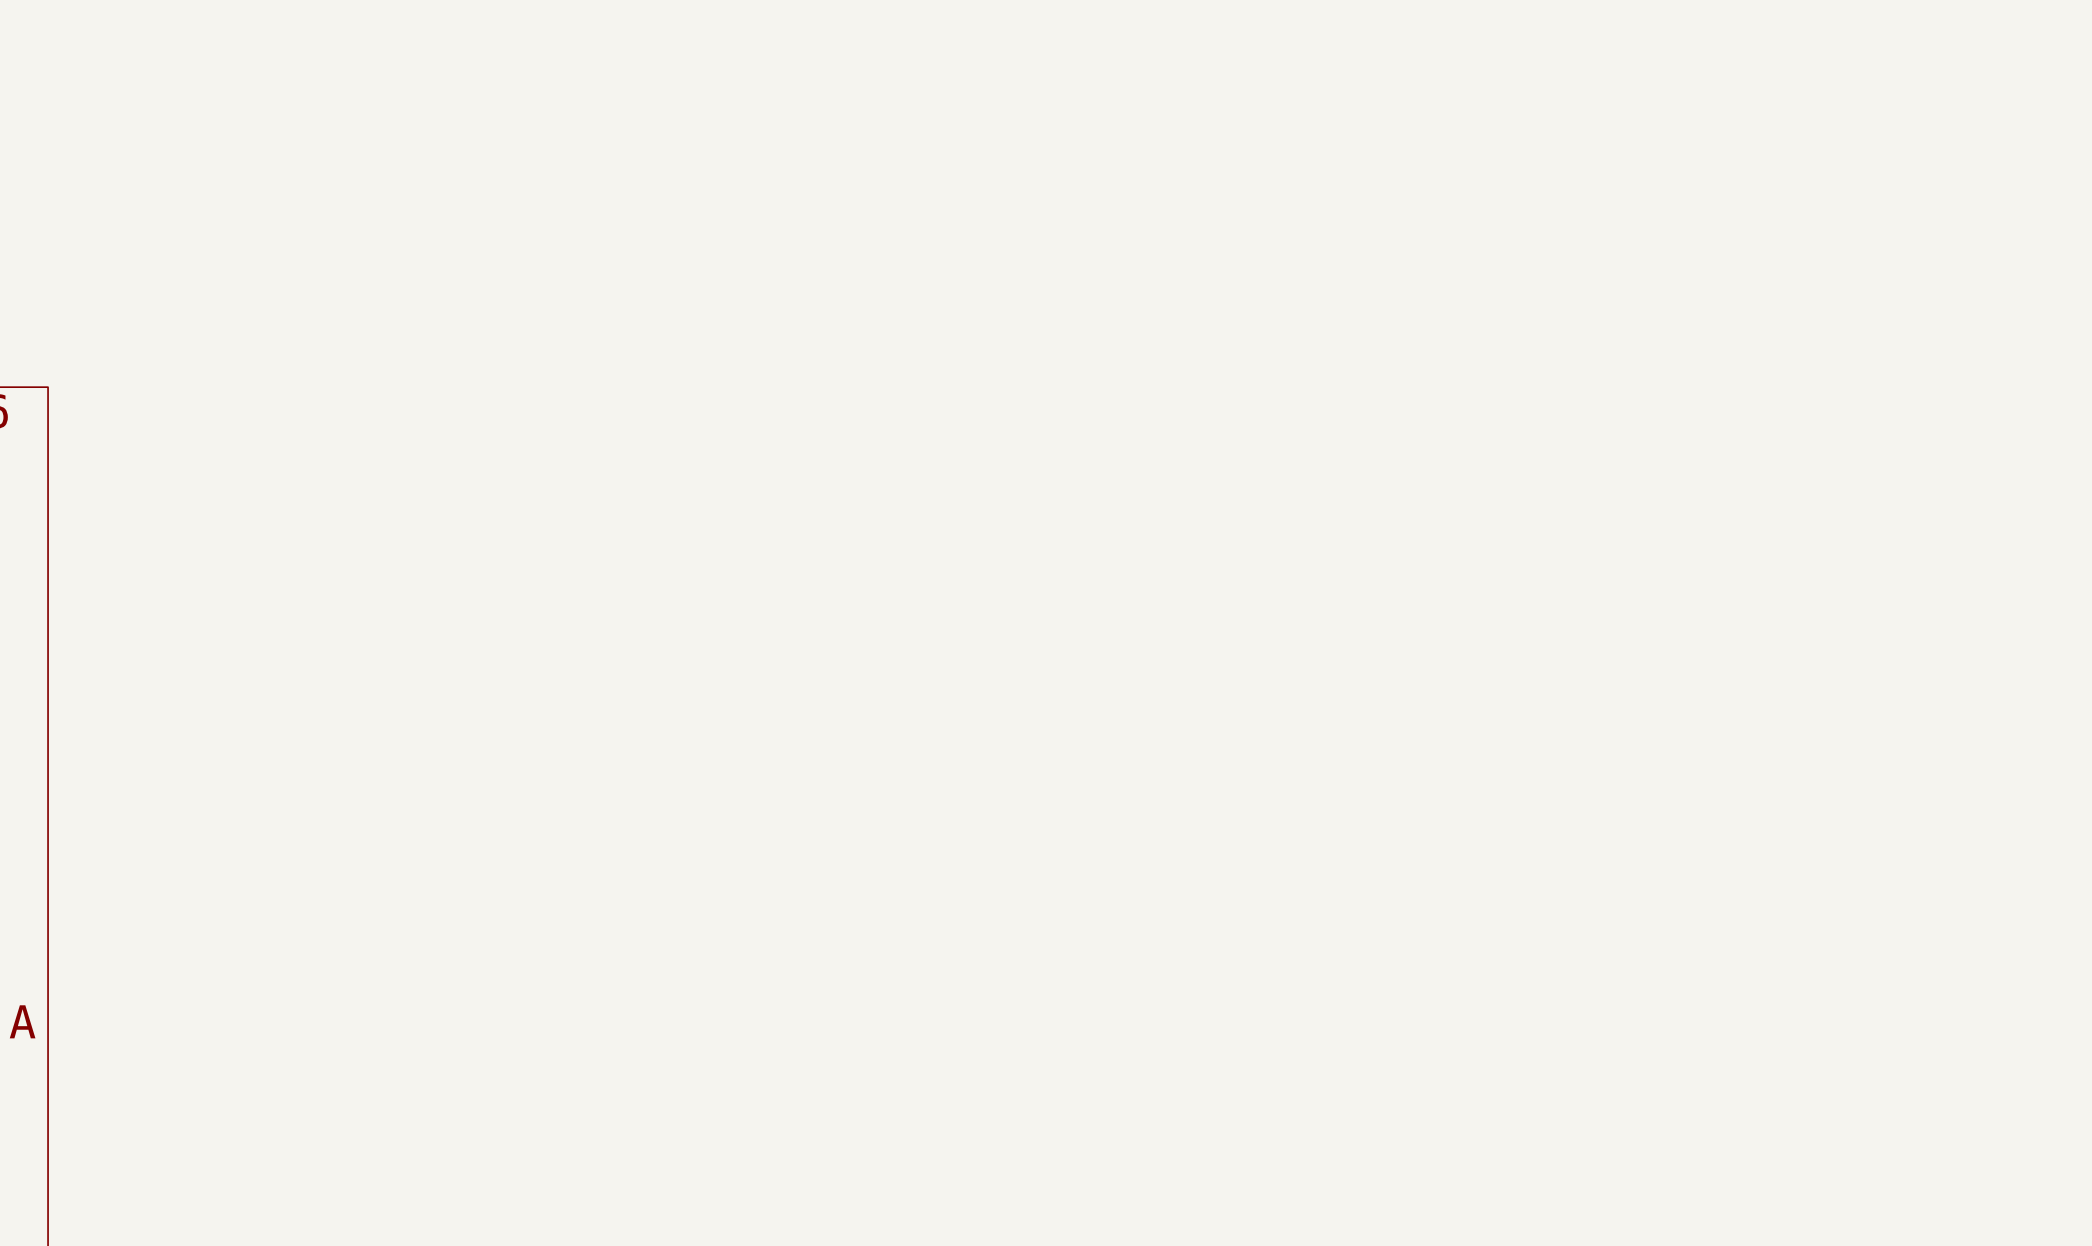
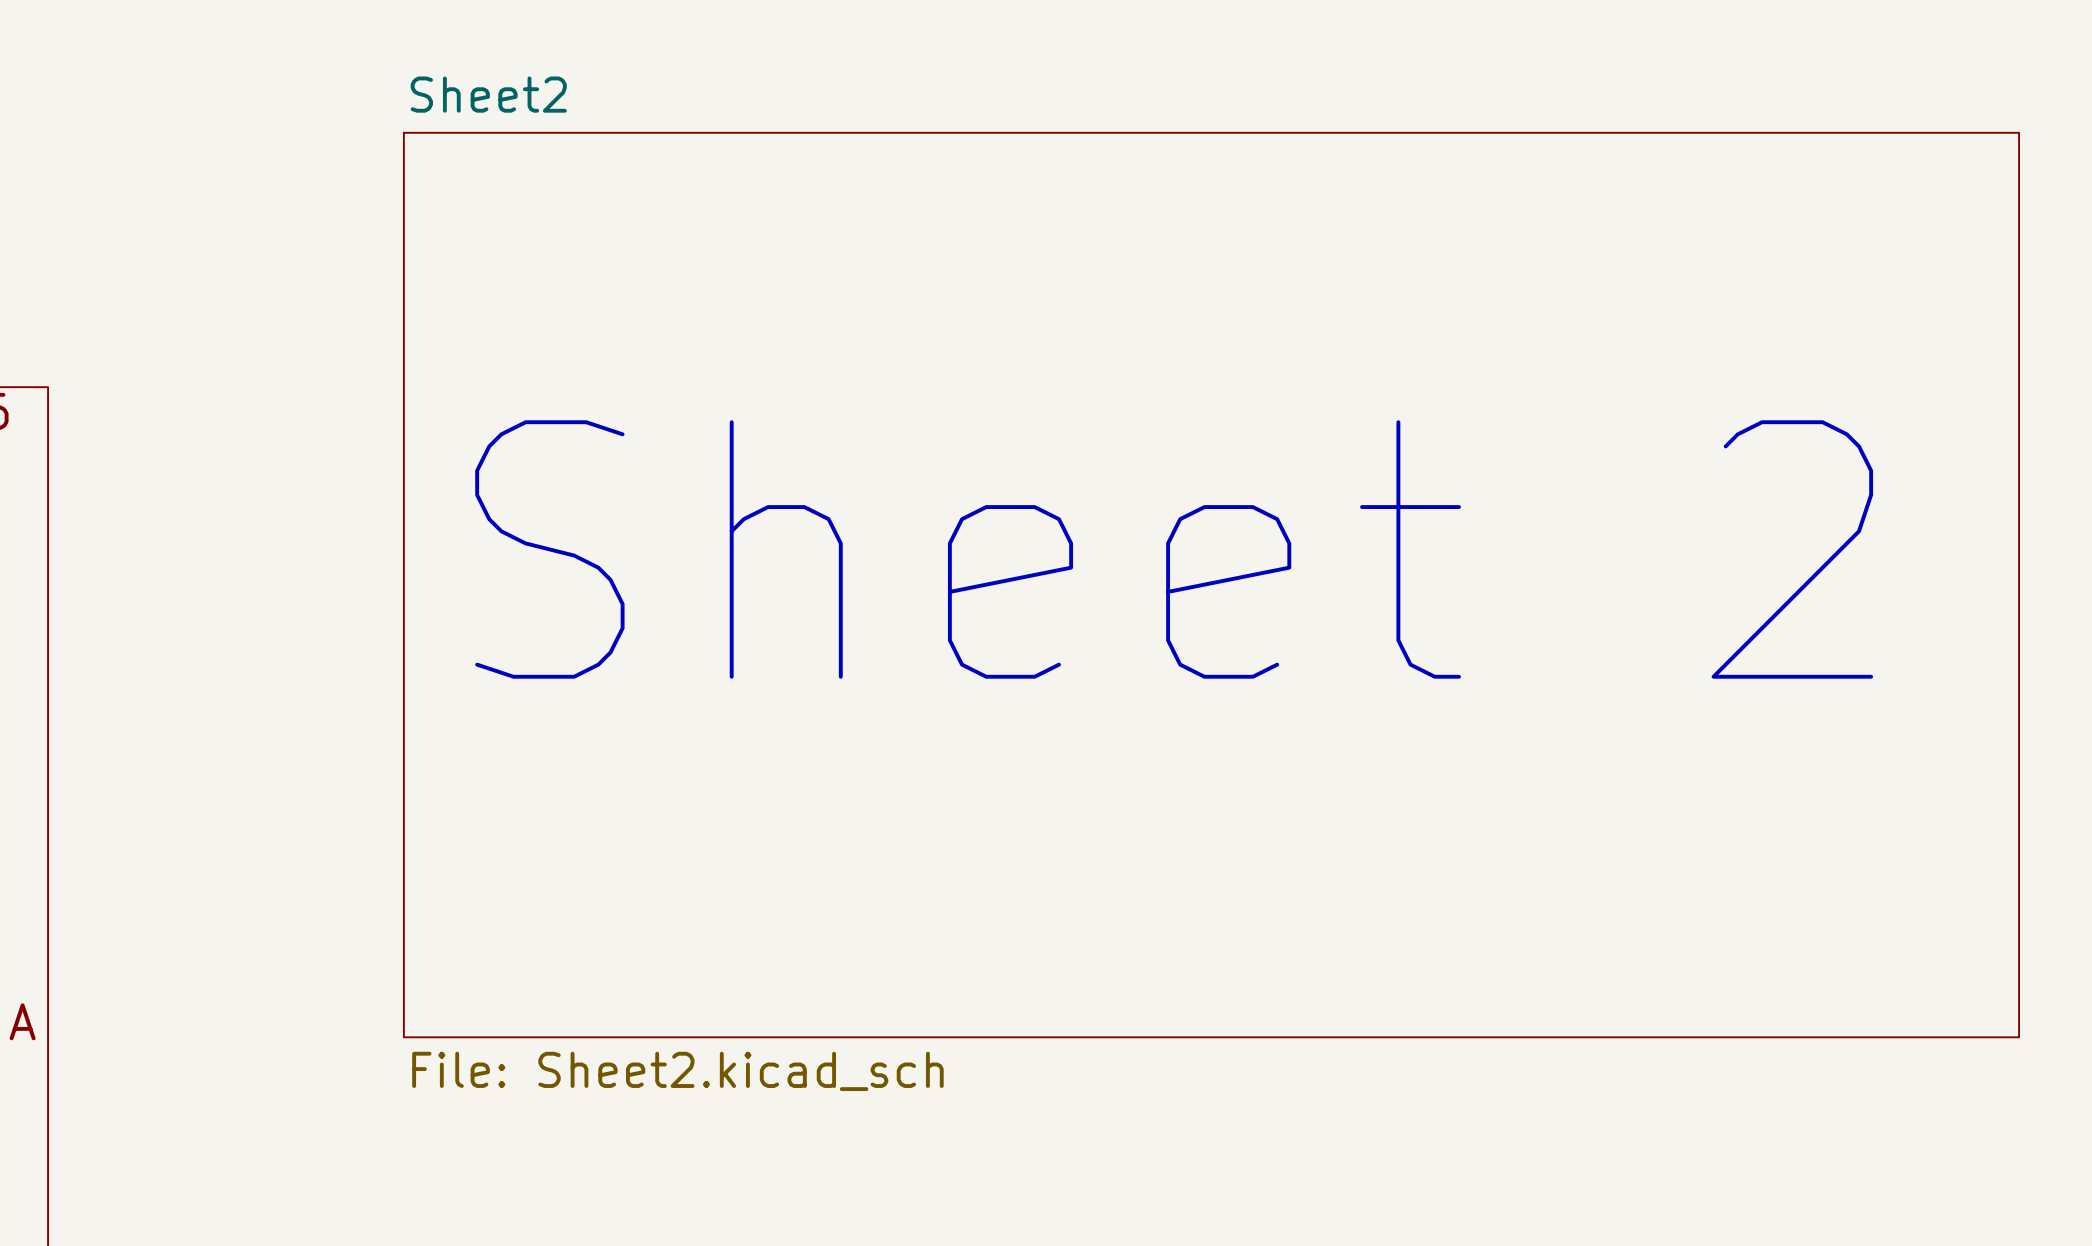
text: none -> Sheet 2 (1174, 549)
sheet Sheet2: none -> File: Sheet2.kicad_sch (1211, 585)

